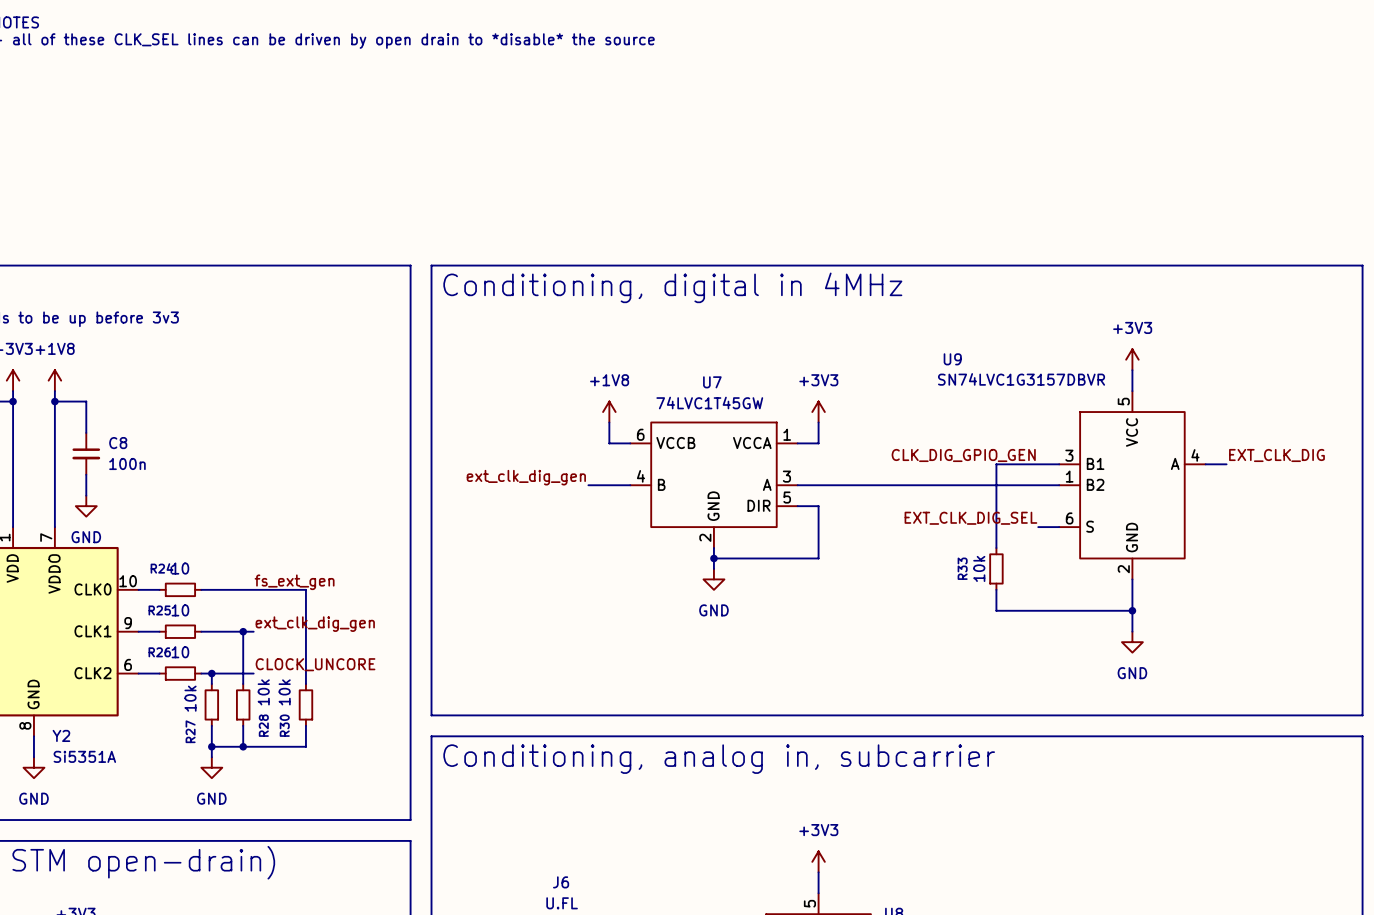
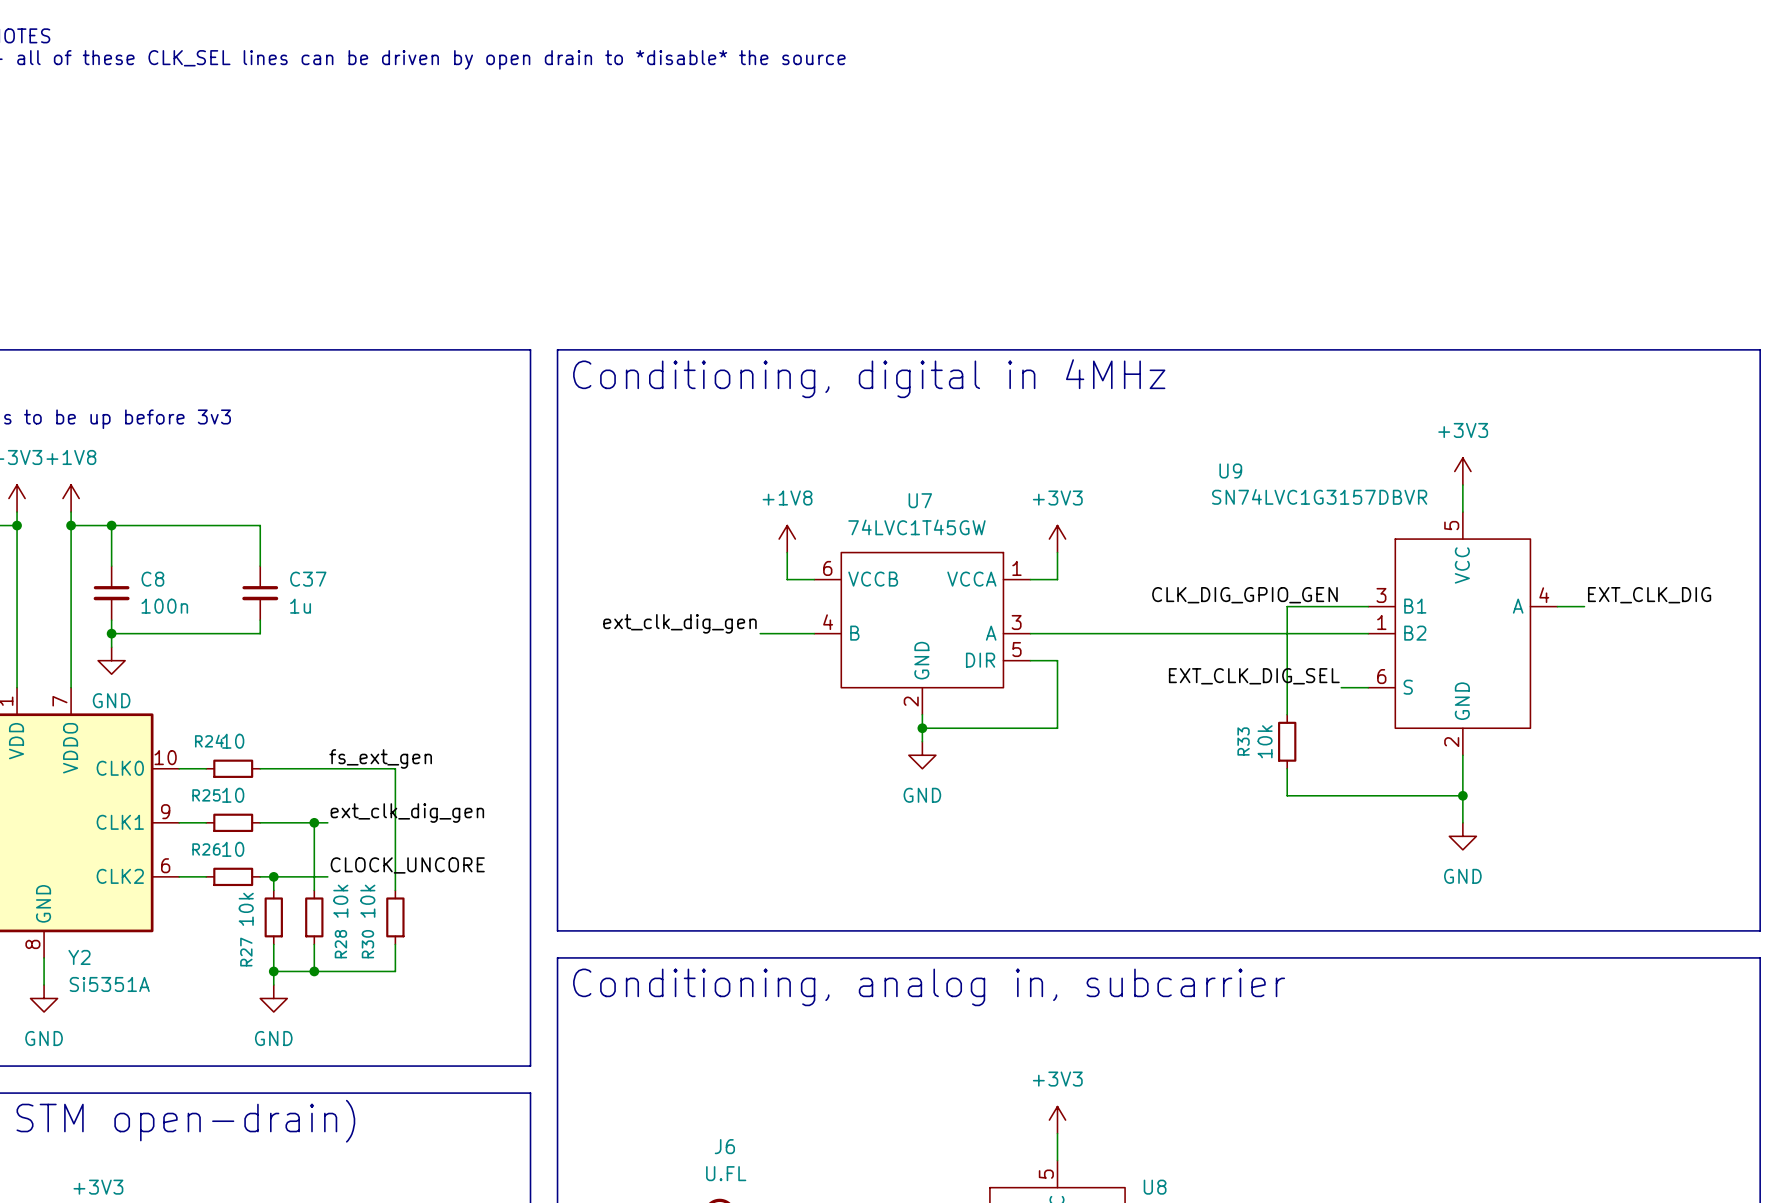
wire: none -> (111, 525) (260, 525) (260, 566)
junction: none -> (111, 525)
C37: none -> 1u (260, 593)
wire: none -> (260, 620) (260, 633) (111, 633)
junction: none -> (111, 633)

